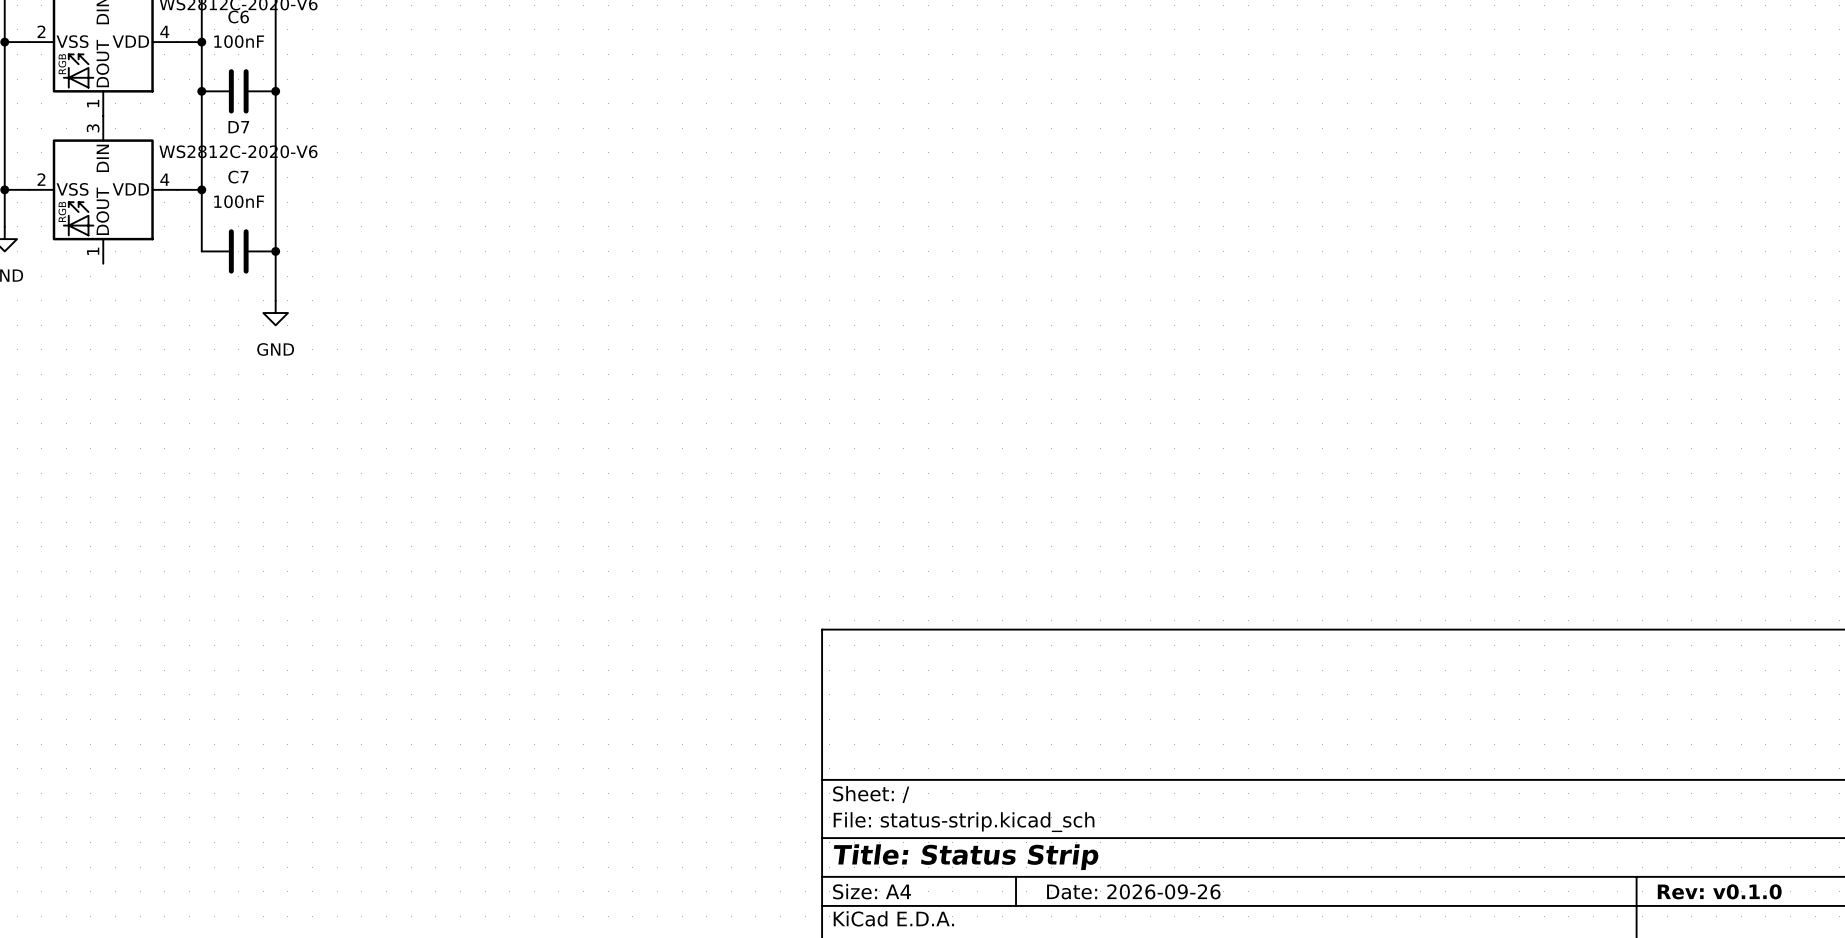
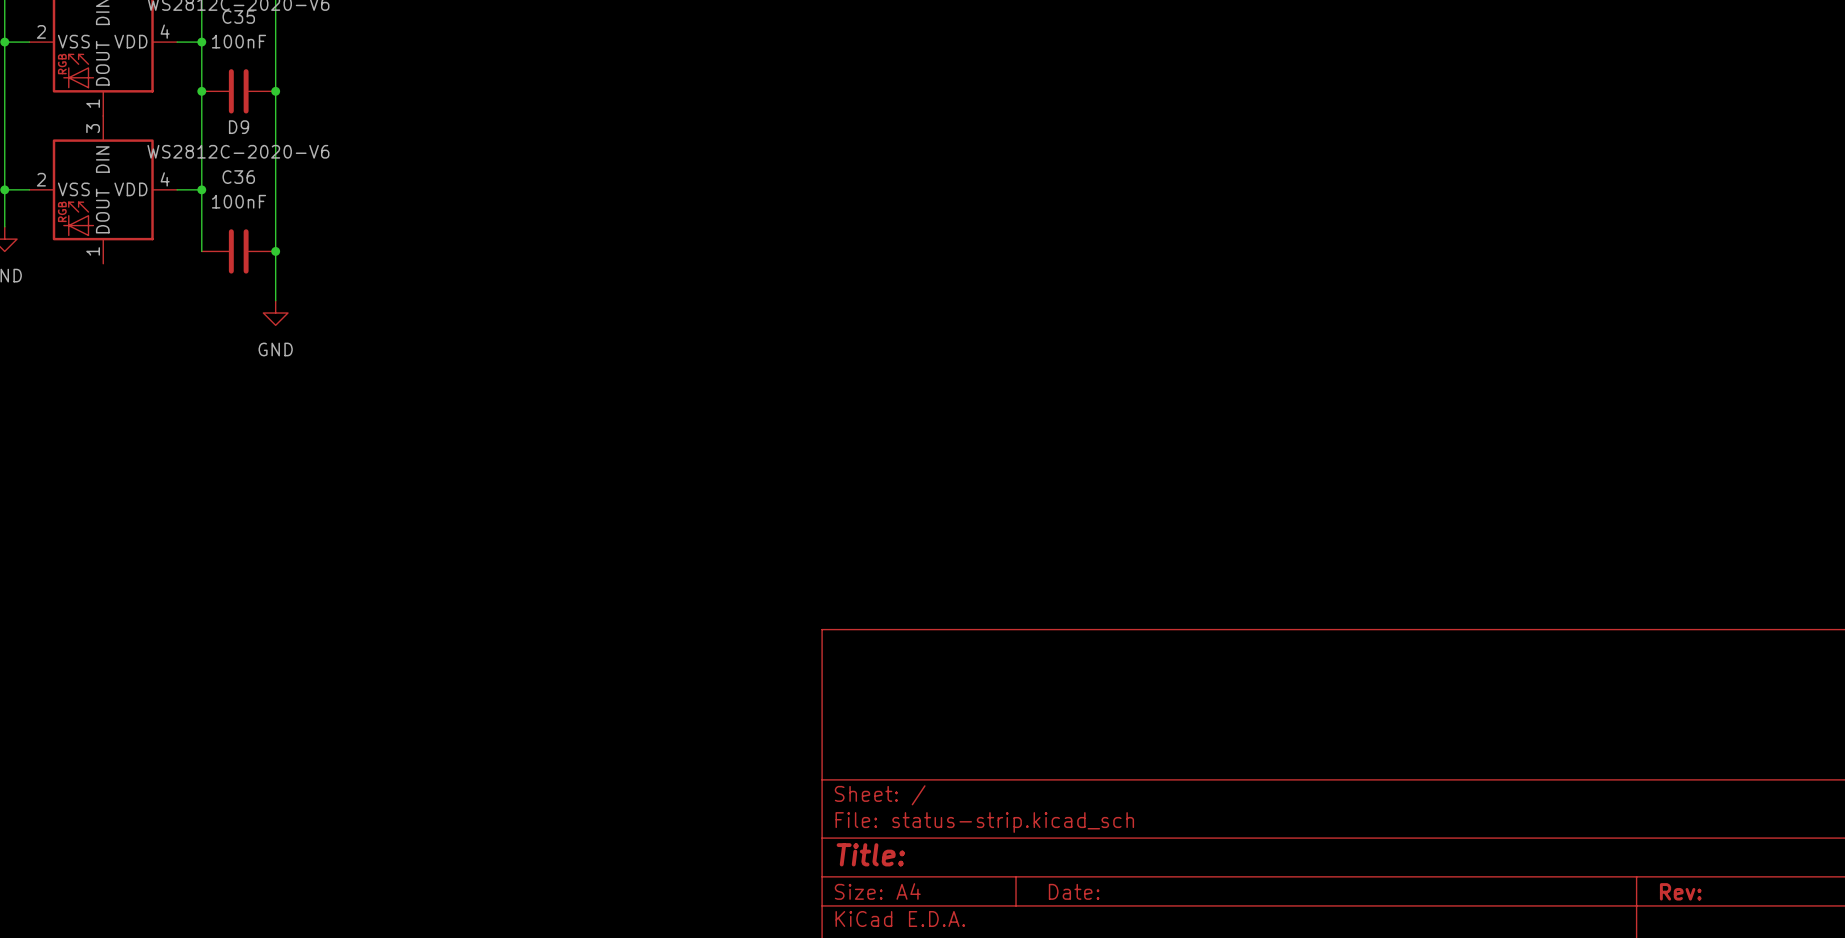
C6 name: C6 (238, 17) -> C35 (238, 16)
D7 name: D7 (238, 127) -> D9 (239, 127)
C7 name: C7 (238, 177) -> C36 (238, 177)
title block: Title: Status Strip (966, 857) -> Title: (870, 854)
title block: Date: 2026-09-26 (1133, 891) -> Date: (1074, 891)
title block: Rev: v0.1.0 (1719, 891) -> Rev: (1680, 891)

